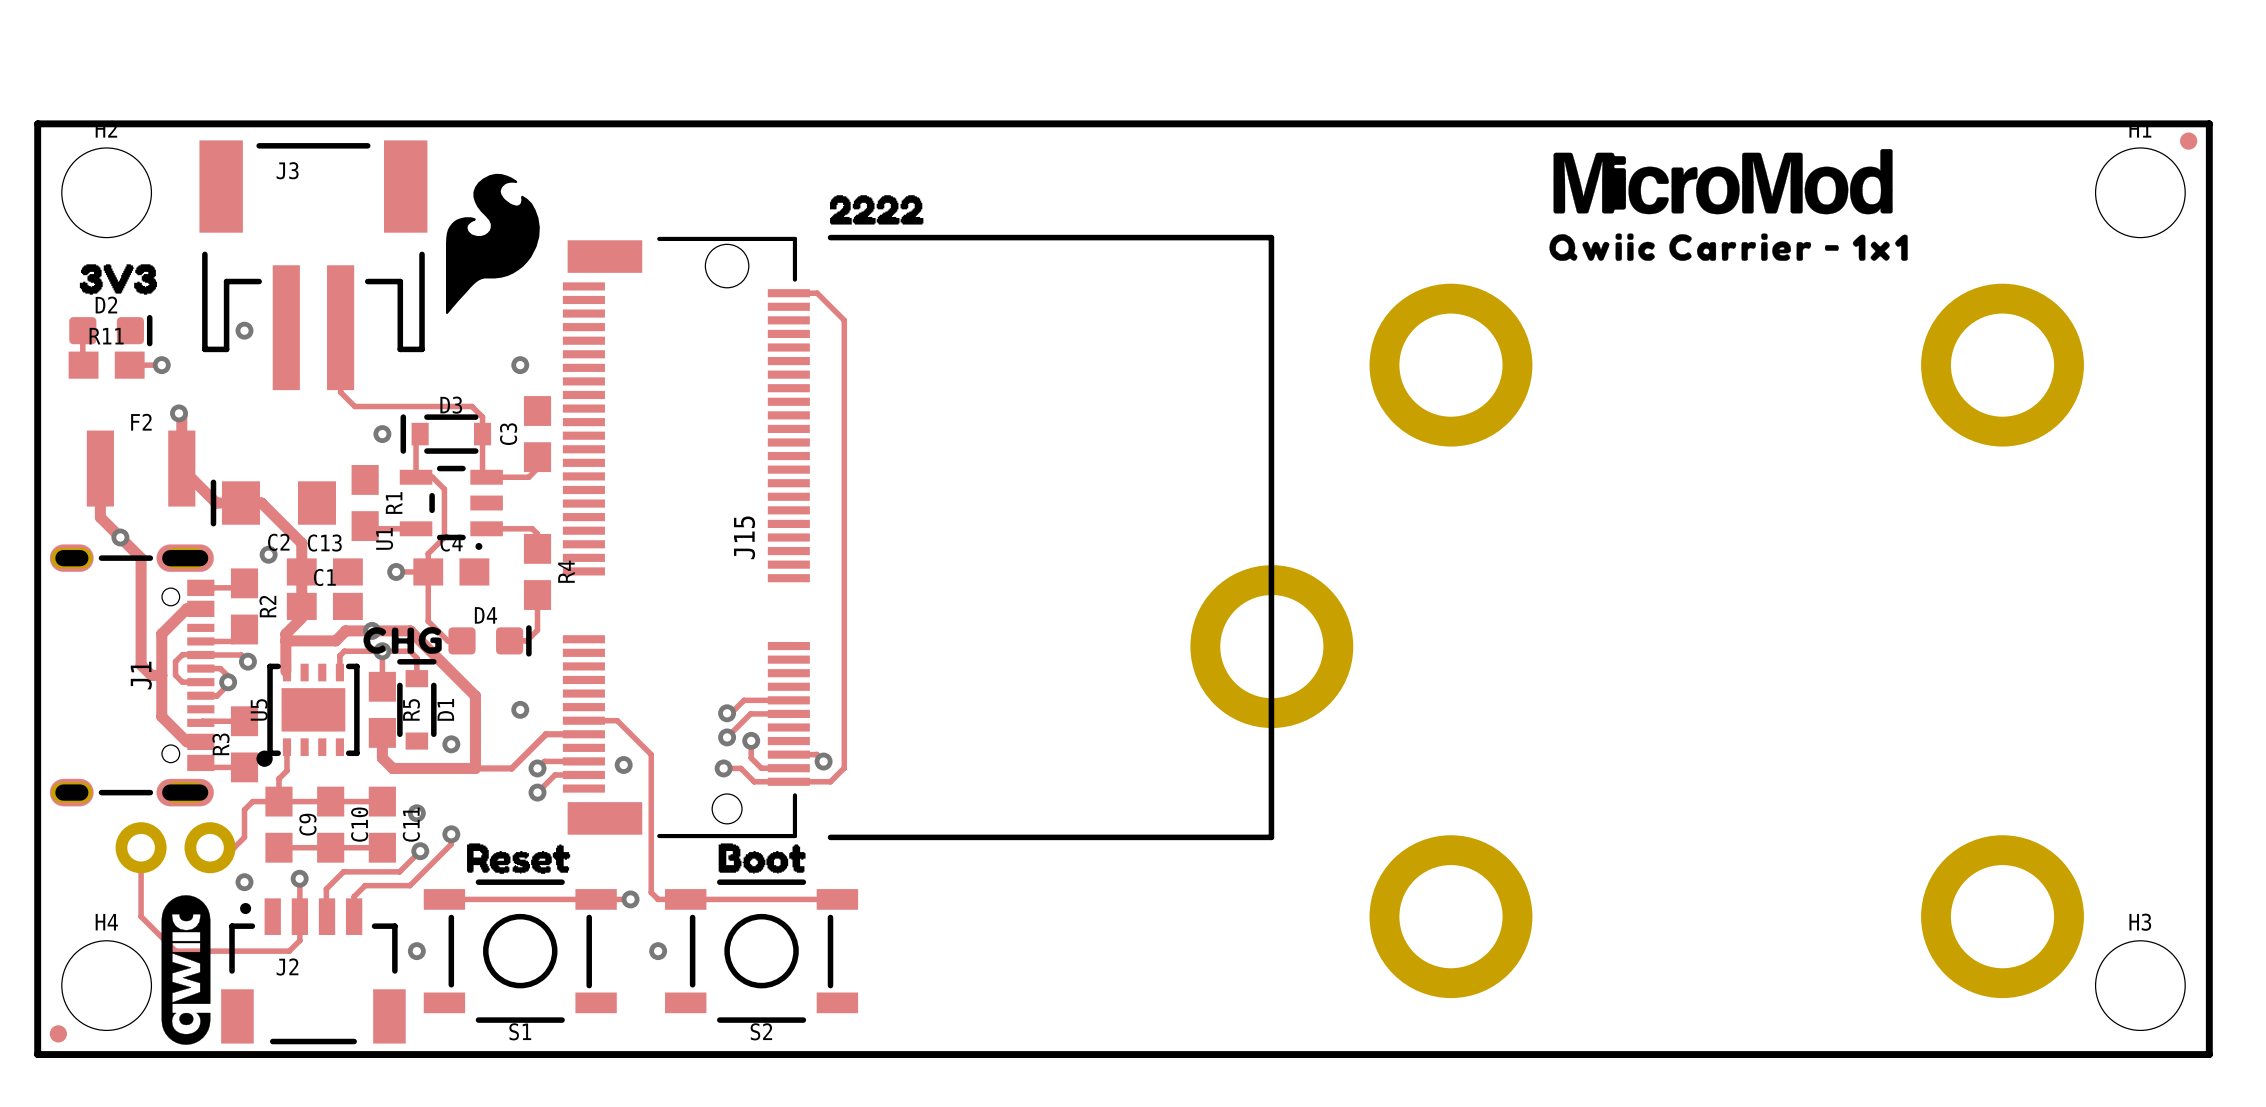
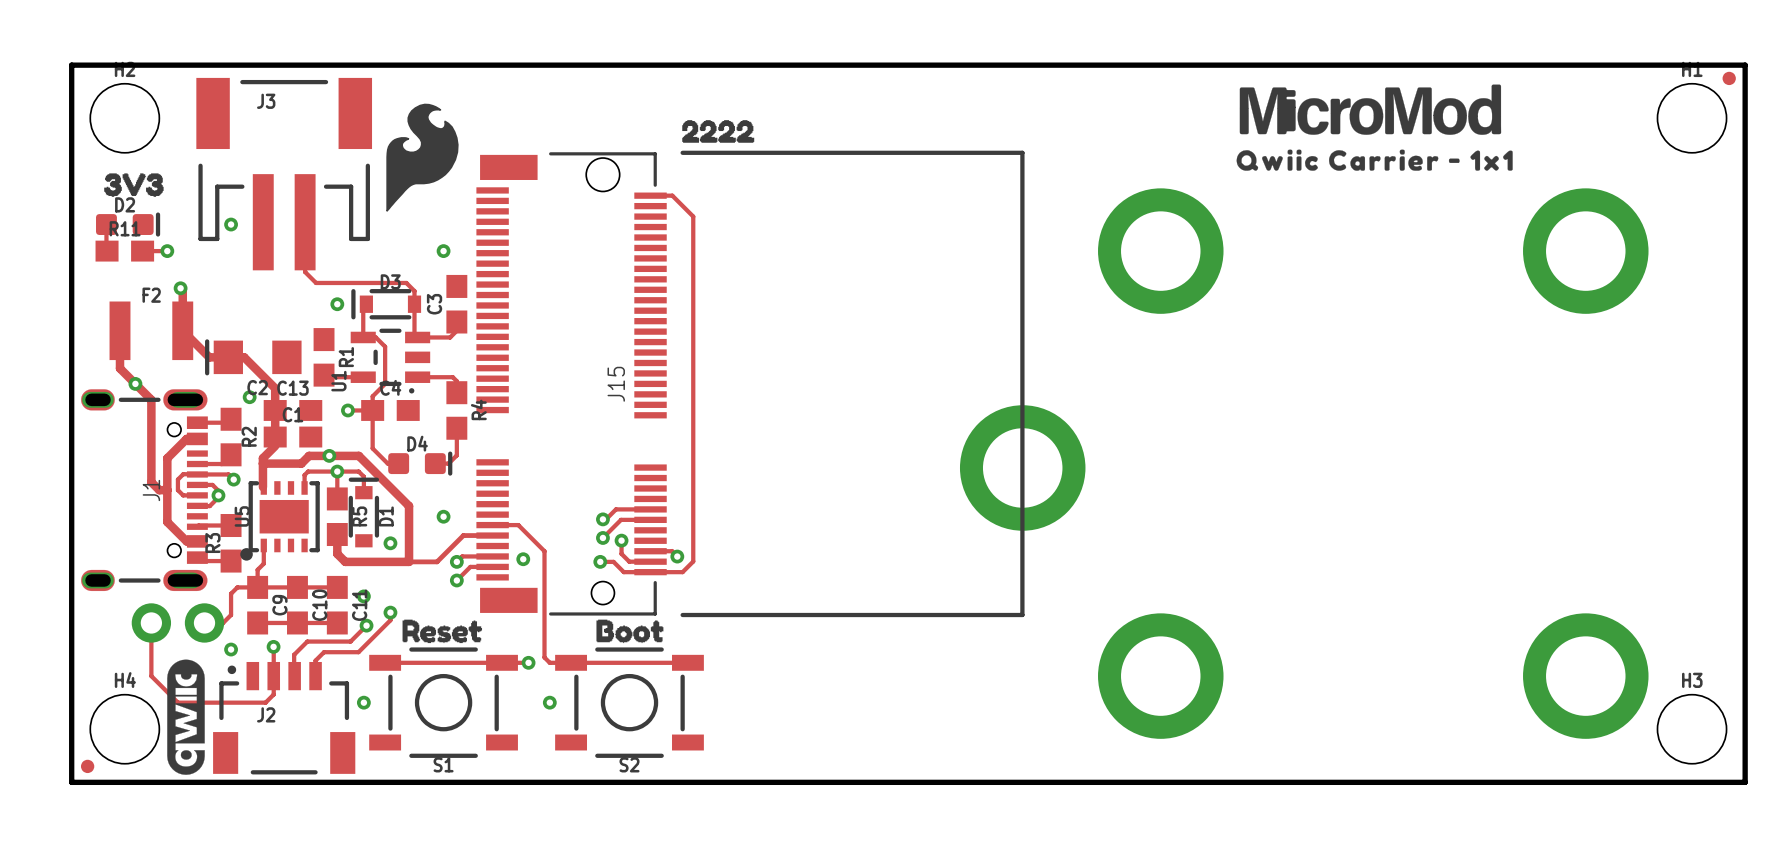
drawing: [363, 626, 442, 654] -> none

